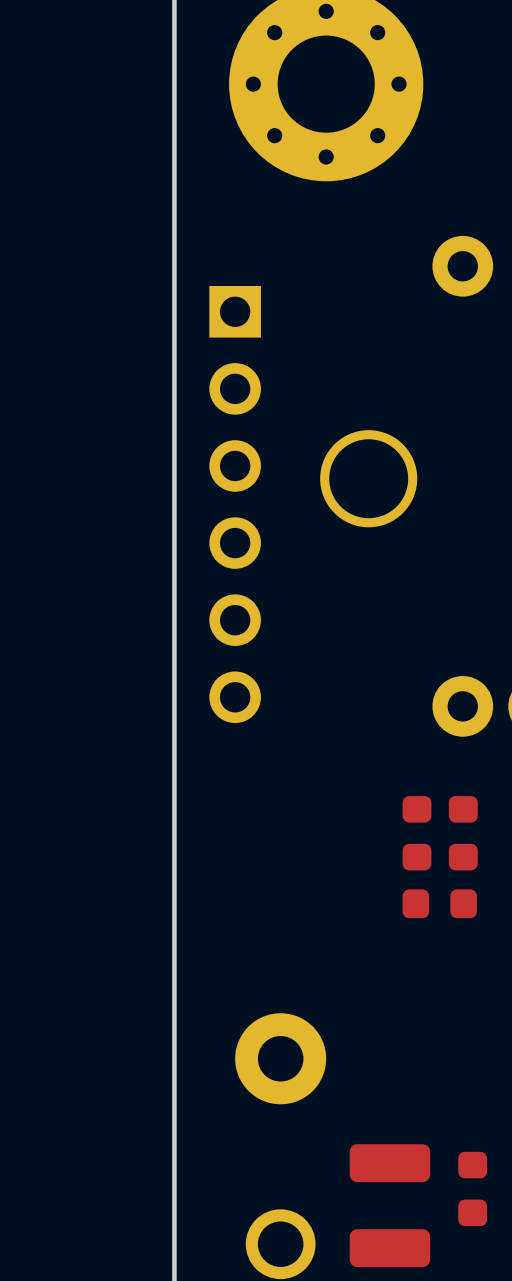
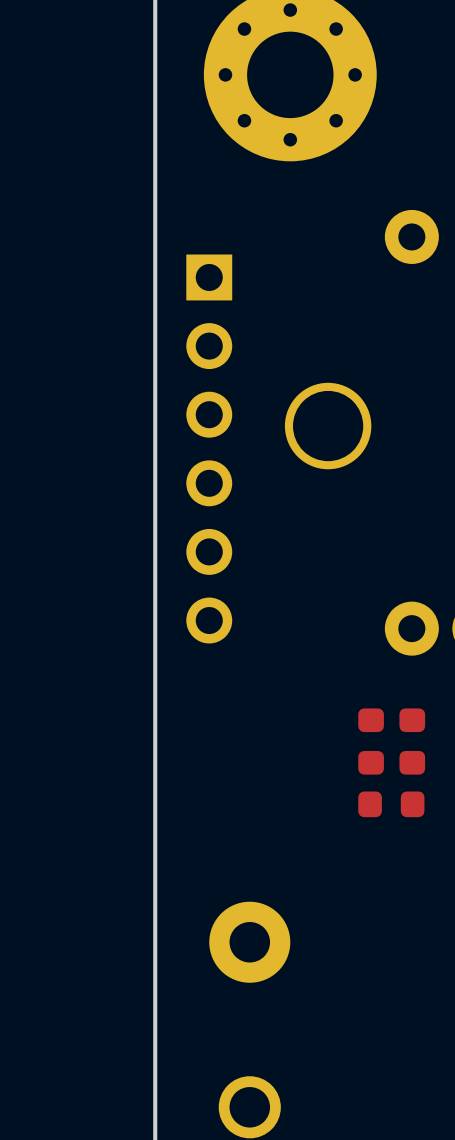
part: (472, 1188) -> none
part: (389, 1205) -> none

